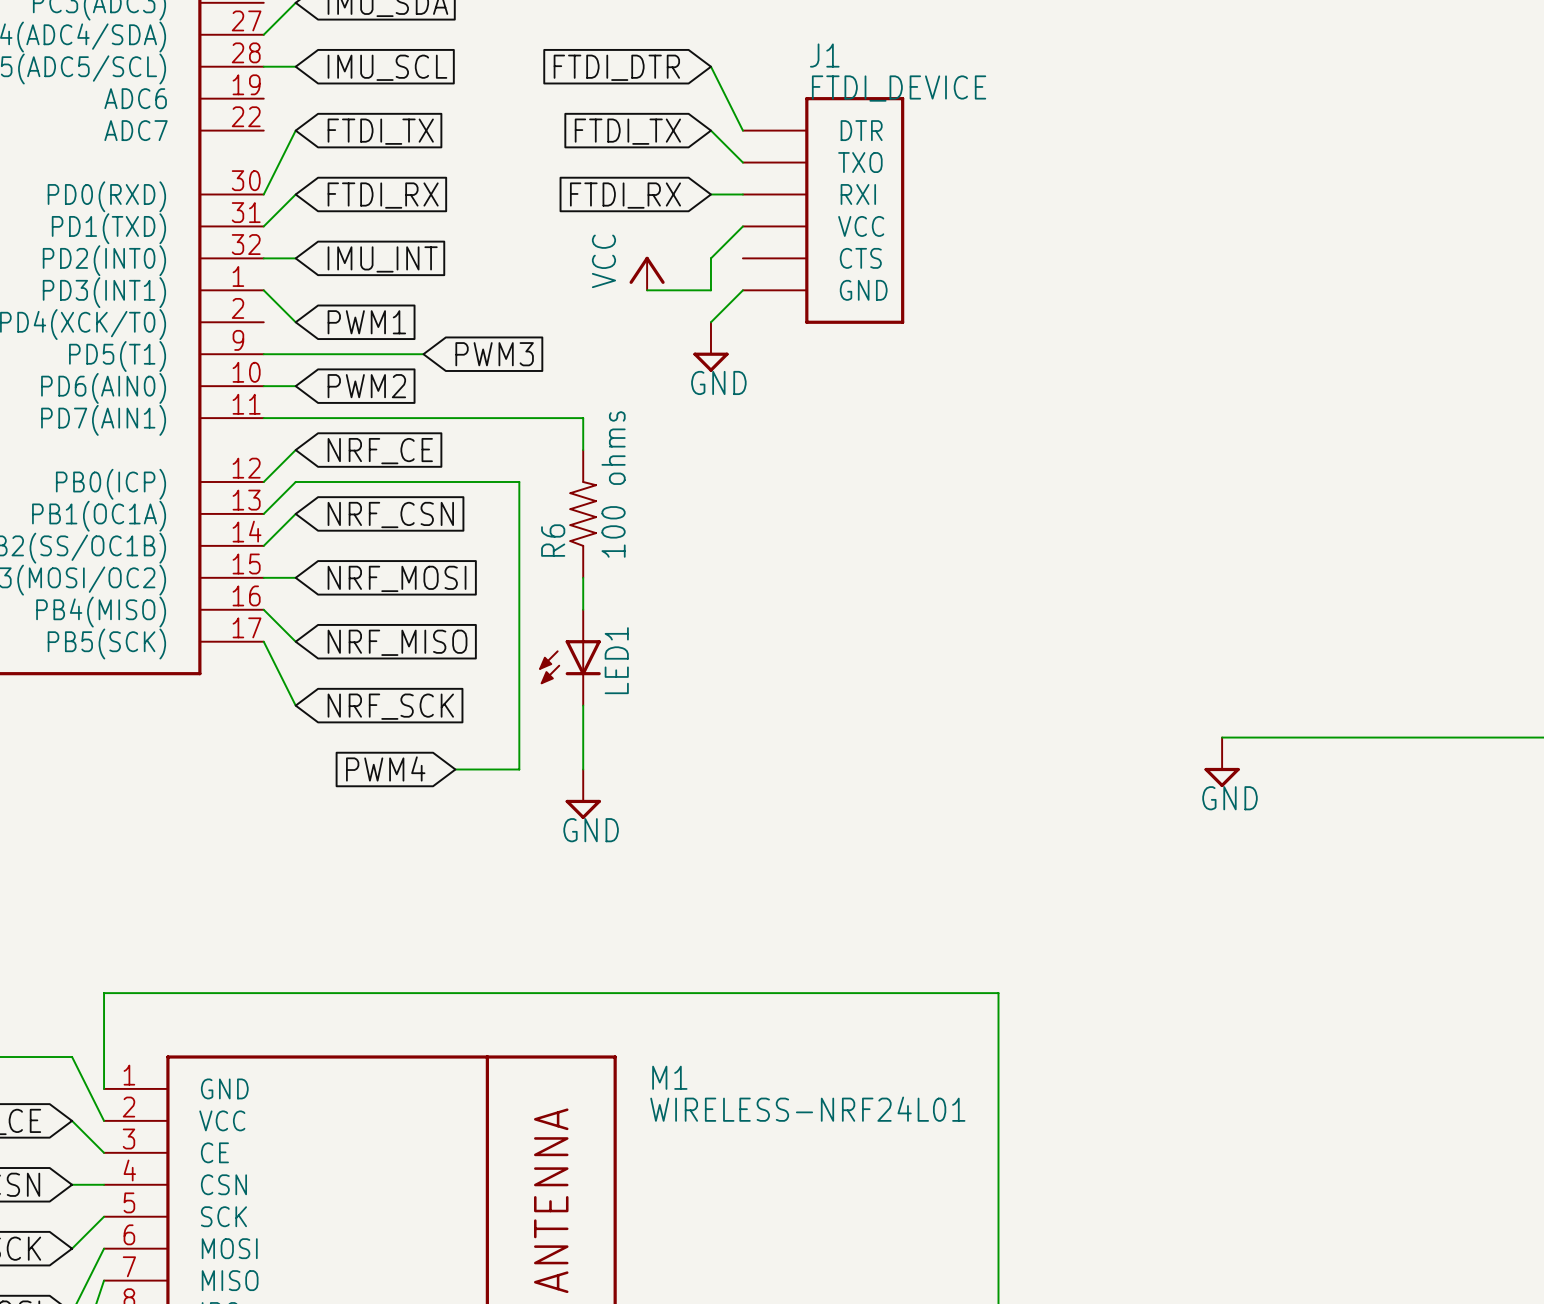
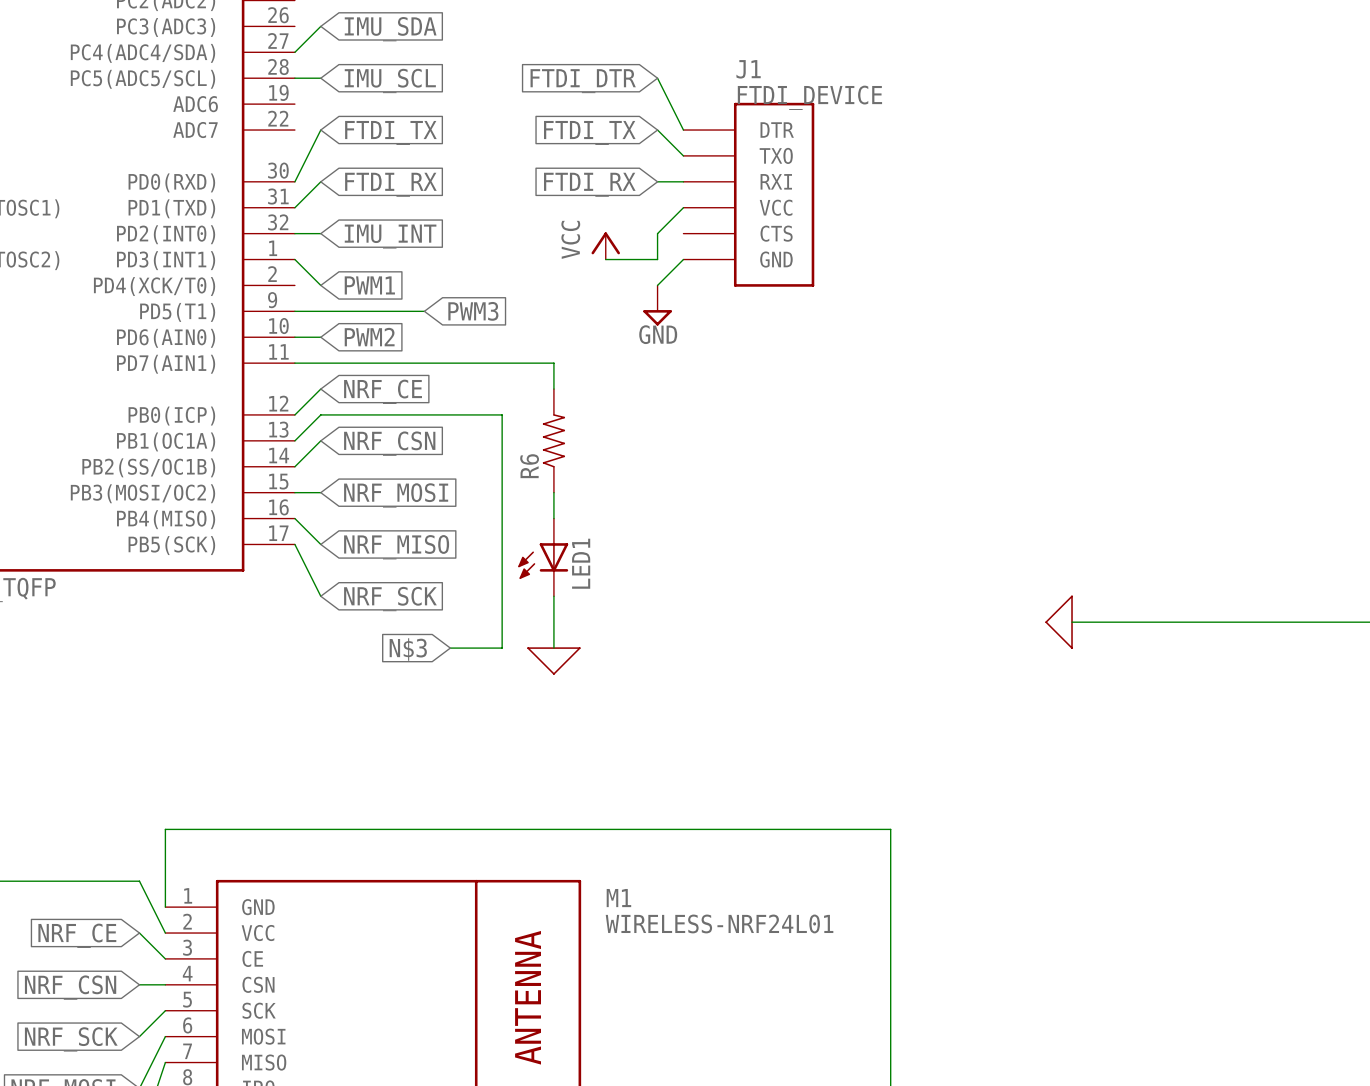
R6 value: 100 ohms (613, 484) -> none
power symbol: none -> (1059, 622)
power symbol: GND (1222, 762) -> none
global label: PWM4 (385, 768) -> N$3 (408, 649)
power symbol shape: [565, 769, 601, 820] -> [527, 647, 581, 675]
power symbol text: GND (591, 830) -> none

